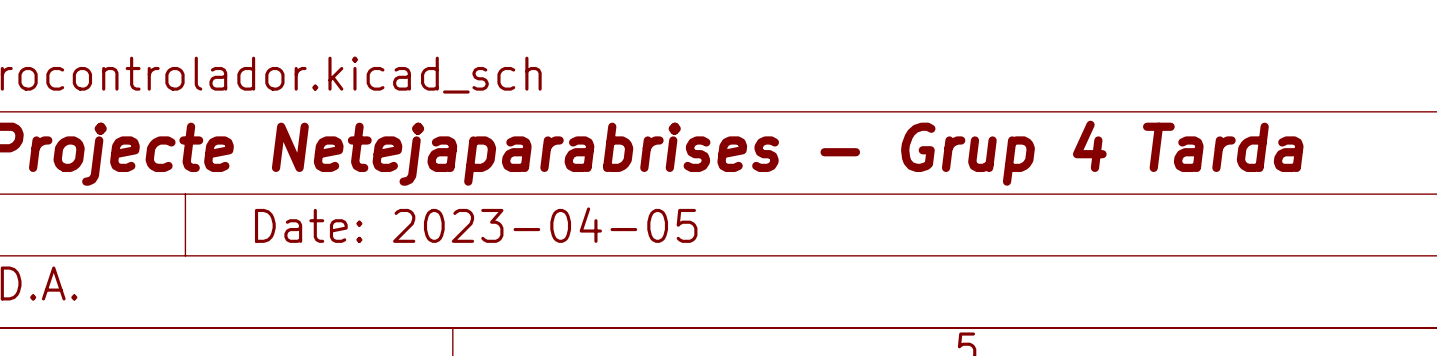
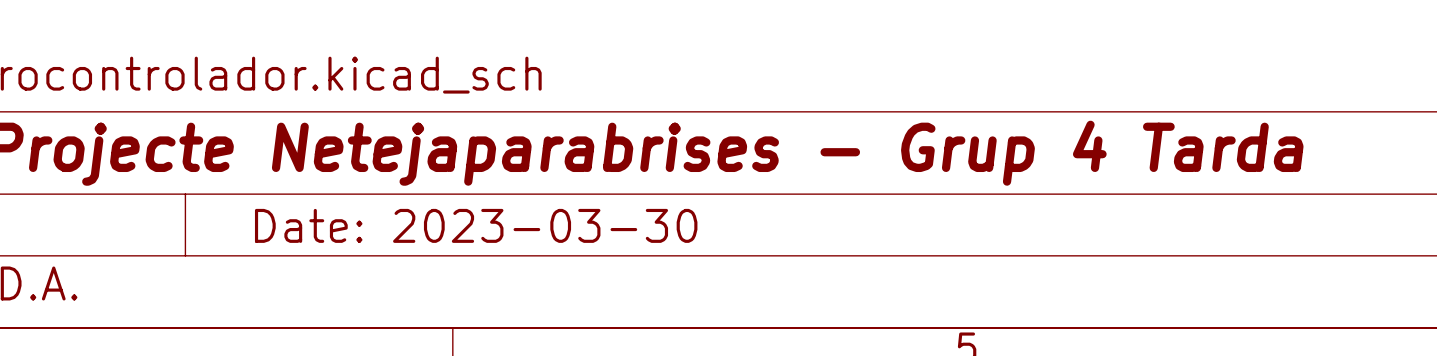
title block: Date: 2023-04-05 (476, 225) -> Date: 2023-03-30 (476, 225)

